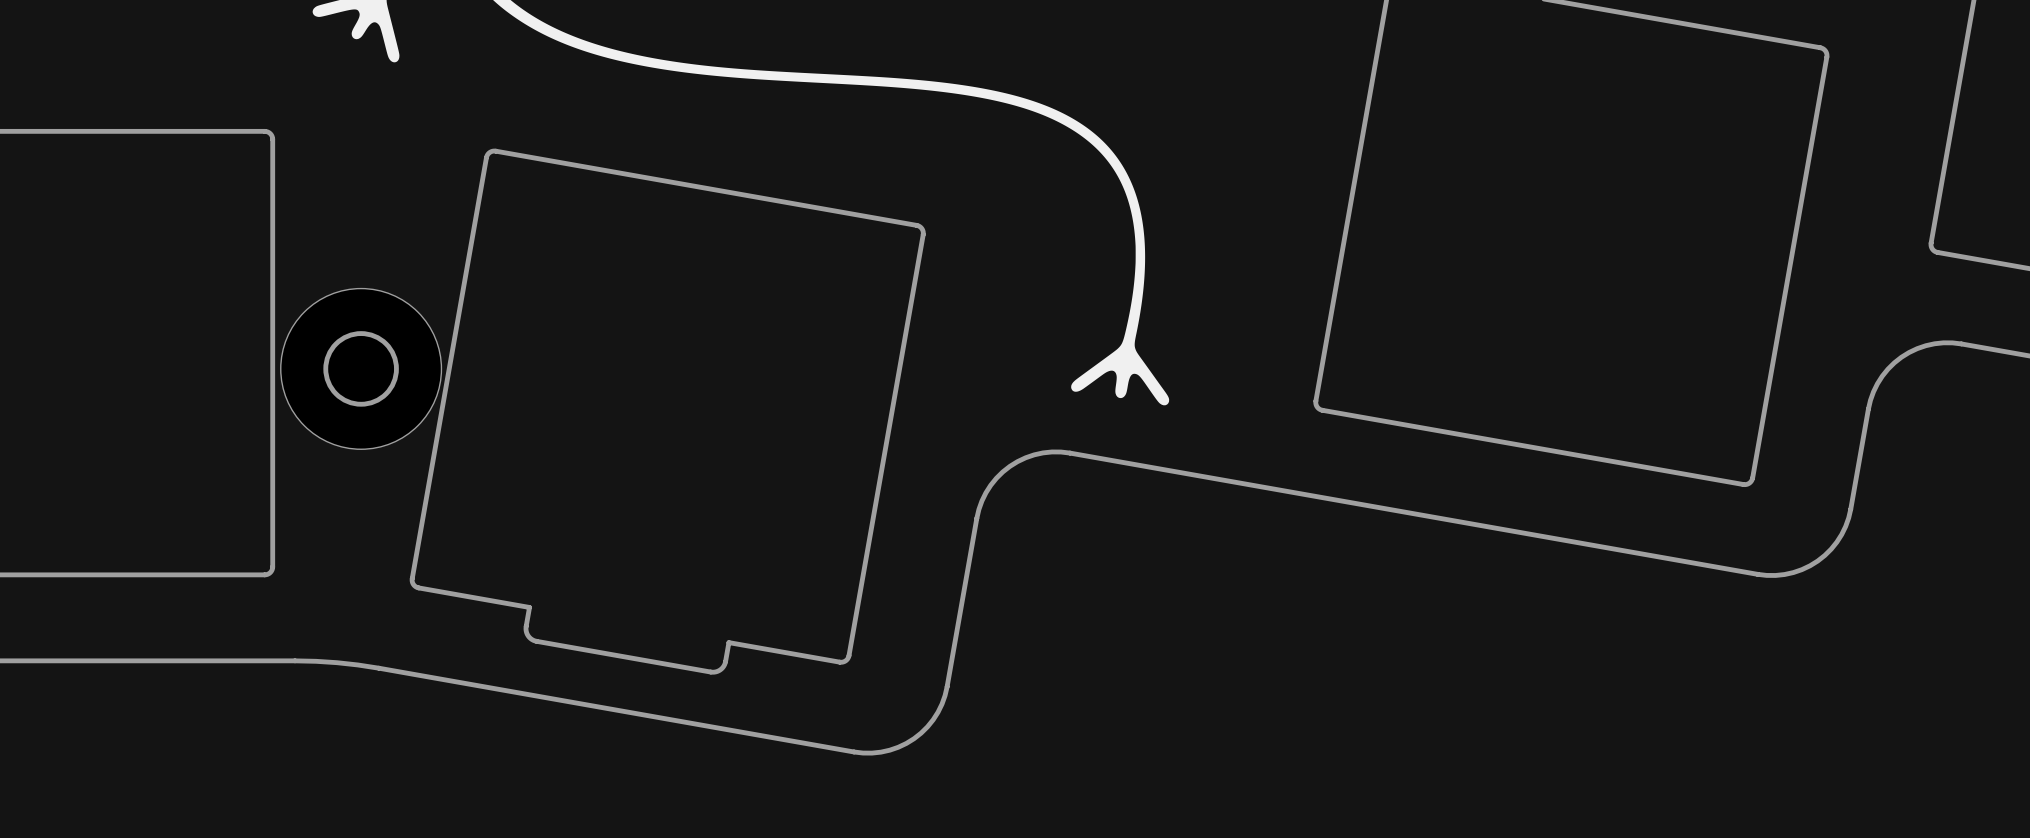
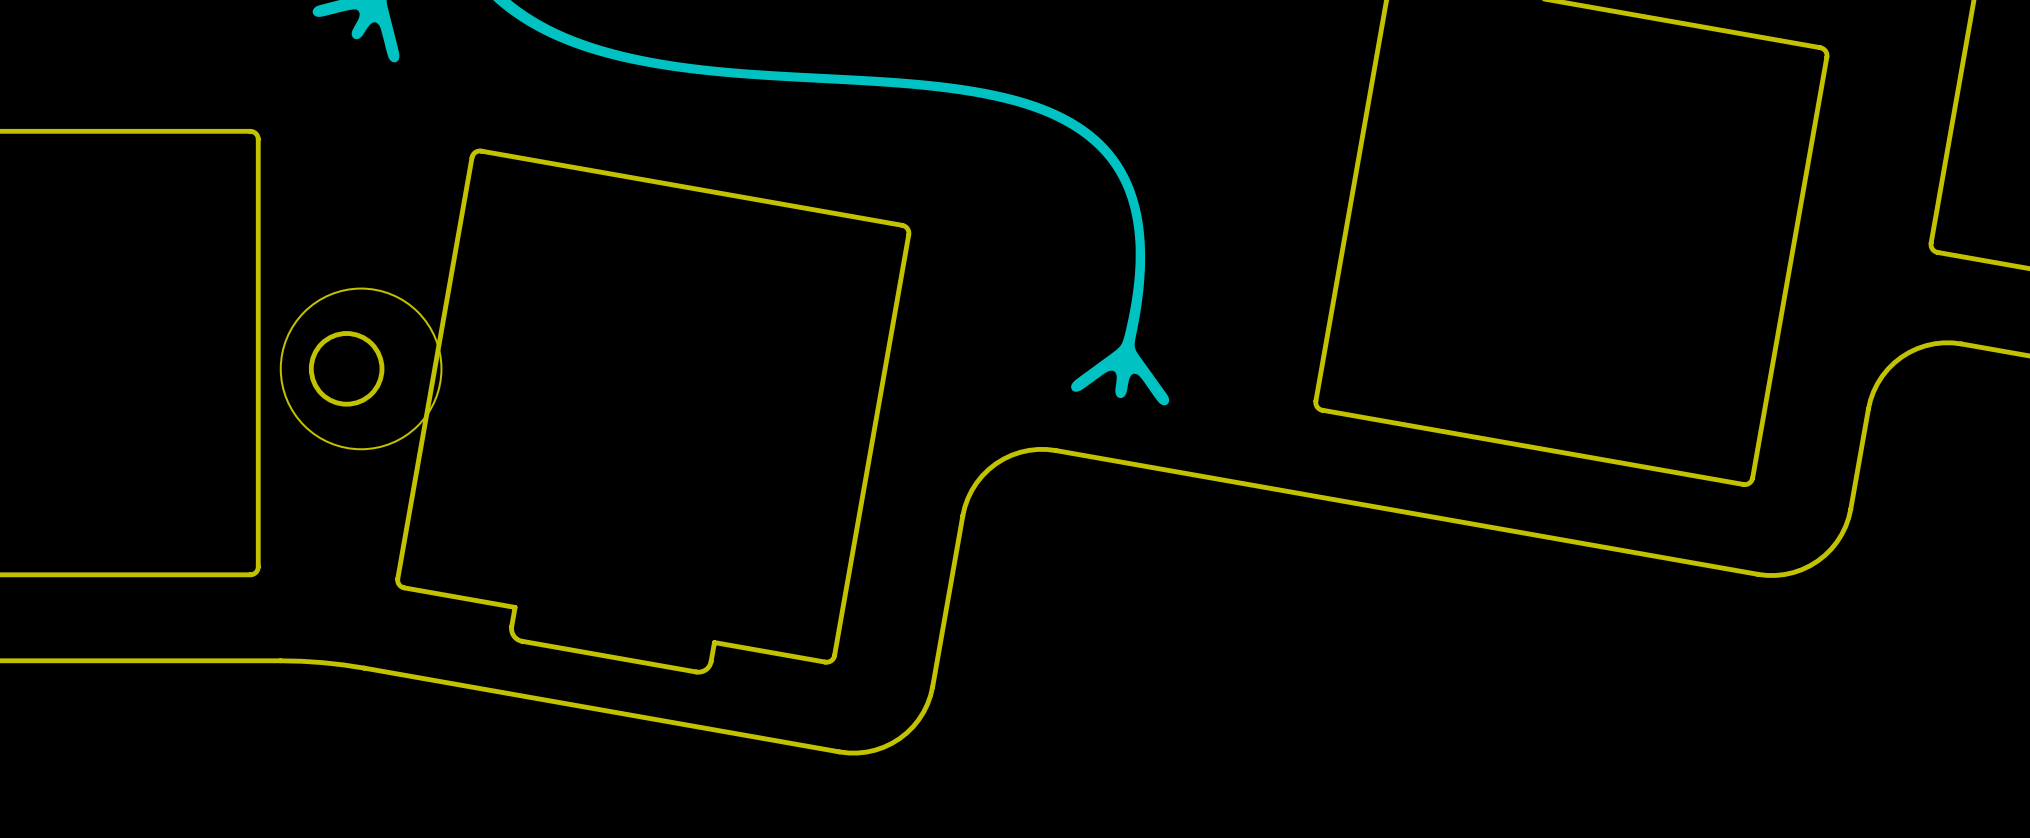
board edge: (250, 131) (267, 131) (272, 139) (272, 566) (267, 574) (250, 574) -> (250, 131) (255, 133) (258, 139) (258, 566) (255, 572) (250, 574)
board edge: (495, 151) (916, 225) (921, 228) (923, 234) (849, 655) (845, 660) (839, 662) (728, 642) (723, 666) (718, 670) (710, 672) (534, 640) (529, 637) (526, 631) (529, 607) (418, 587) (413, 584) (412, 578) (486, 157) (489, 152) (495, 151) -> (511, 626) (515, 607) (404, 587) (399, 585) (397, 580) (473, 153) (481, 151) (906, 227) (908, 234) (832, 659) (825, 662) (714, 642) (709, 666) (704, 670) (697, 672) (520, 640) (513, 635) (511, 626)
round board edge position: (361, 368) -> (346, 368)
board edge: (1069, 453) (1043, 452) (1017, 461) (1002, 471) (985, 492) (976, 518) (947, 686) (942, 704) (933, 719) (921, 733) (906, 743) (889, 750) (872, 753) (854, 751) (357, 664) (280, 660) -> (1069, 453) (1046, 449) (1020, 452) (995, 463) (976, 482) (967, 498) (962, 515) (932, 686) (927, 704) (918, 719) (906, 733) (891, 743) (875, 750) (857, 753) (839, 751) (364, 668) (322, 662) (280, 660)

